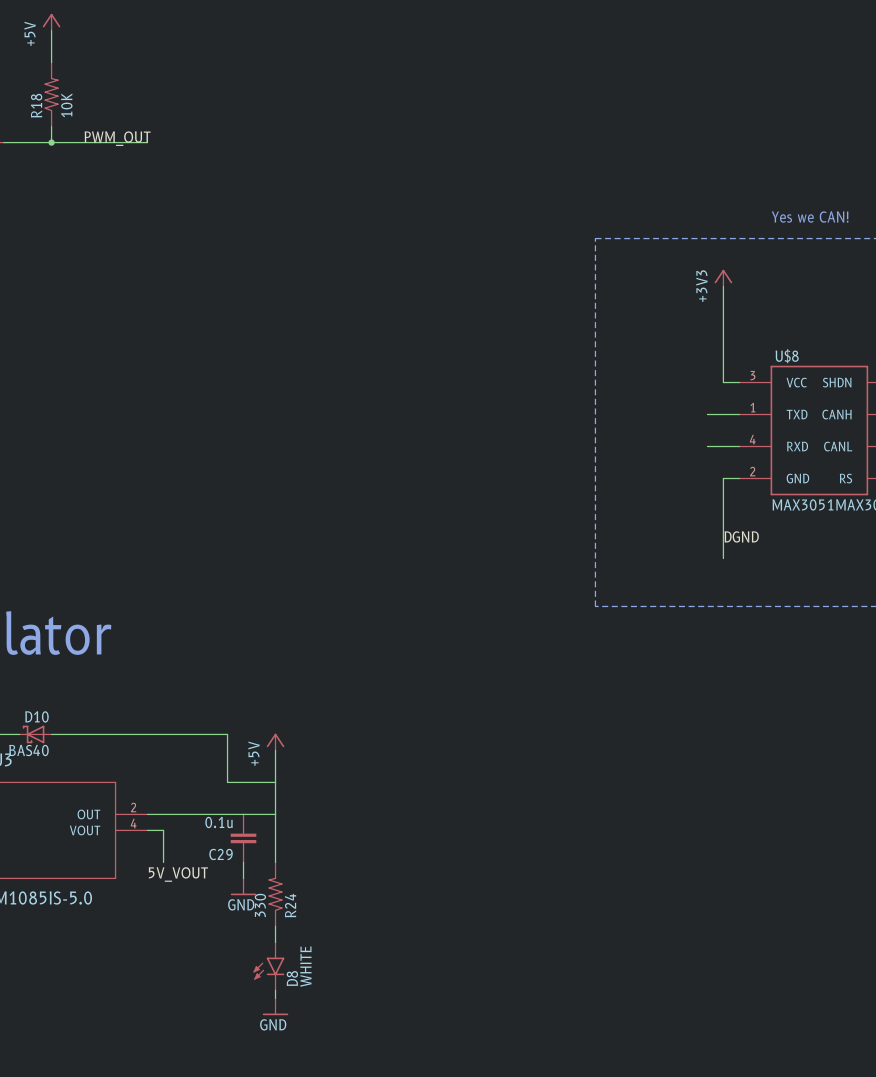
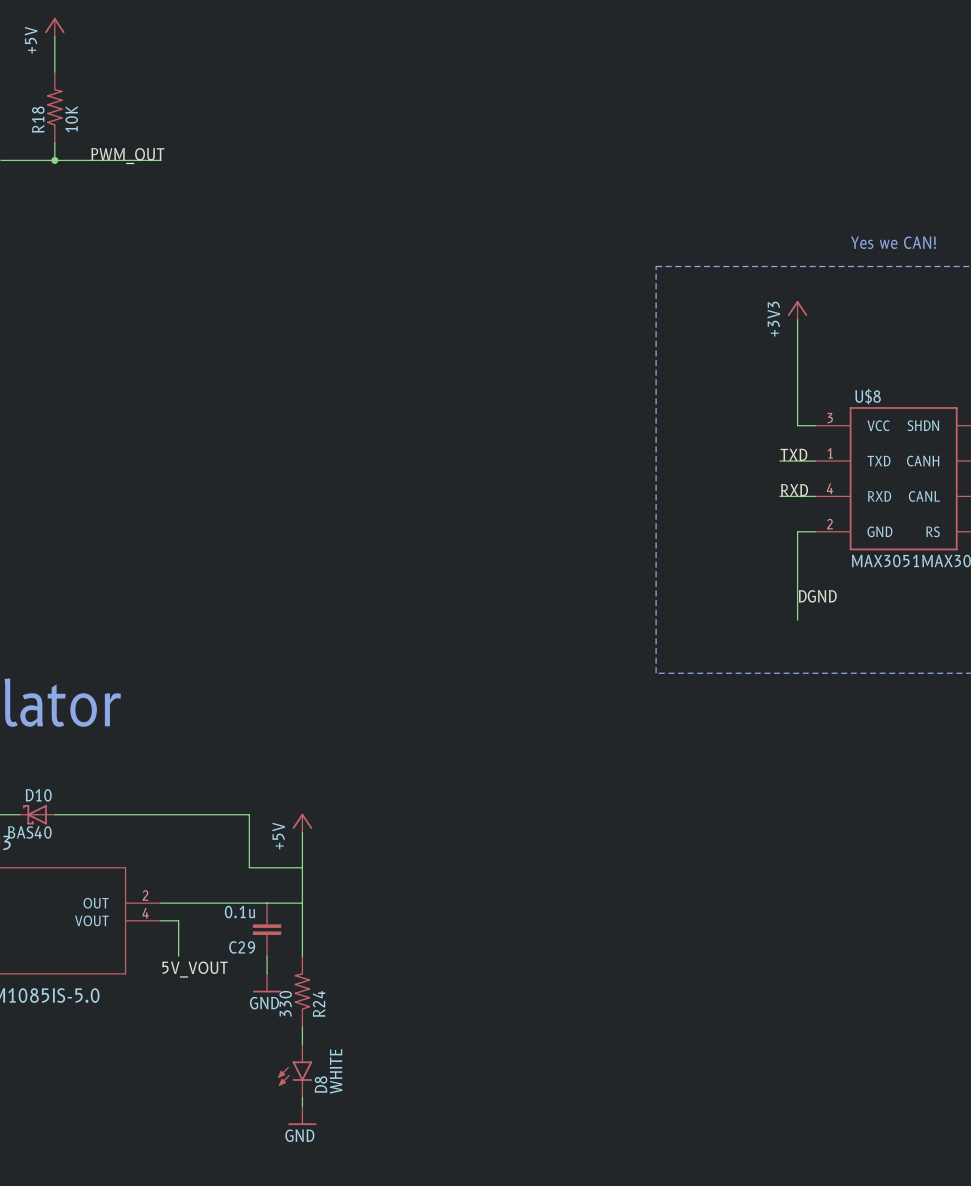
label: none -> TXD (793, 454)
label: none -> RXD (794, 490)

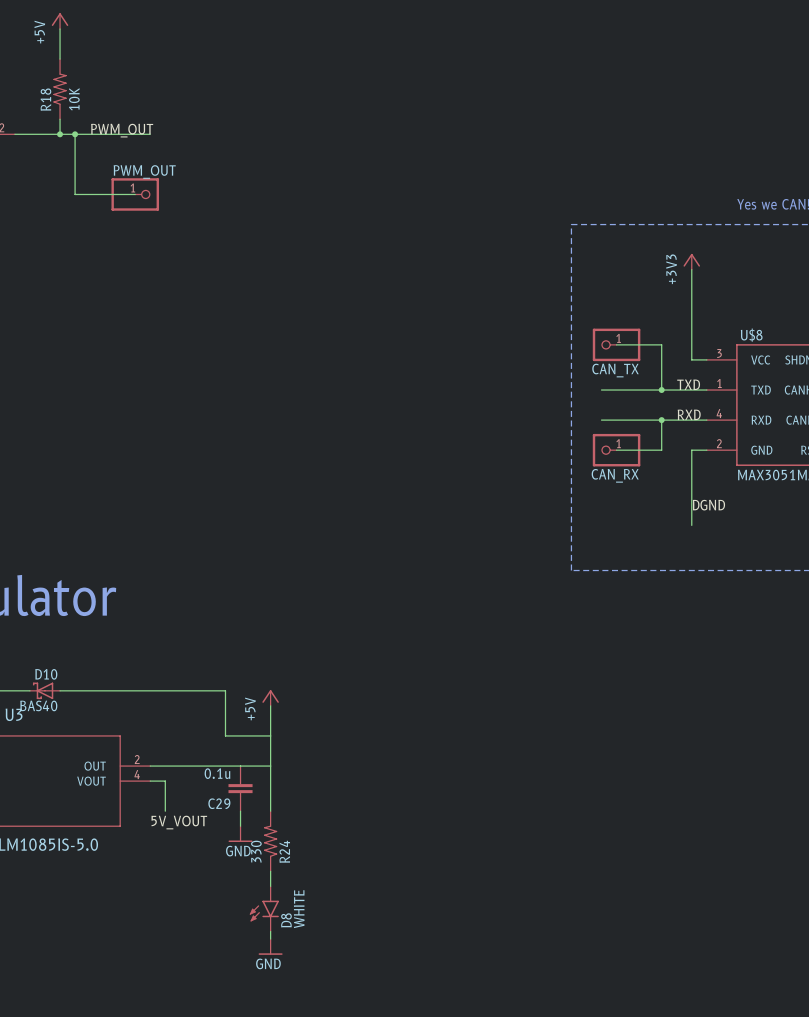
wire: none -> (75, 134) (75, 194) (135, 194)
junction: none -> (75, 134)
PWM_OUT: none -> (135, 194)
wire: none -> (616, 344) (661, 344) (661, 390)
CAN_TX: none -> (616, 344)
wire: none -> (601, 390) (676, 390)
junction: none -> (661, 390)
wire: none -> (601, 420) (676, 420)
wire: none -> (661, 420) (661, 450) (616, 450)
junction: none -> (661, 420)
CAN_RX: none -> (616, 450)

